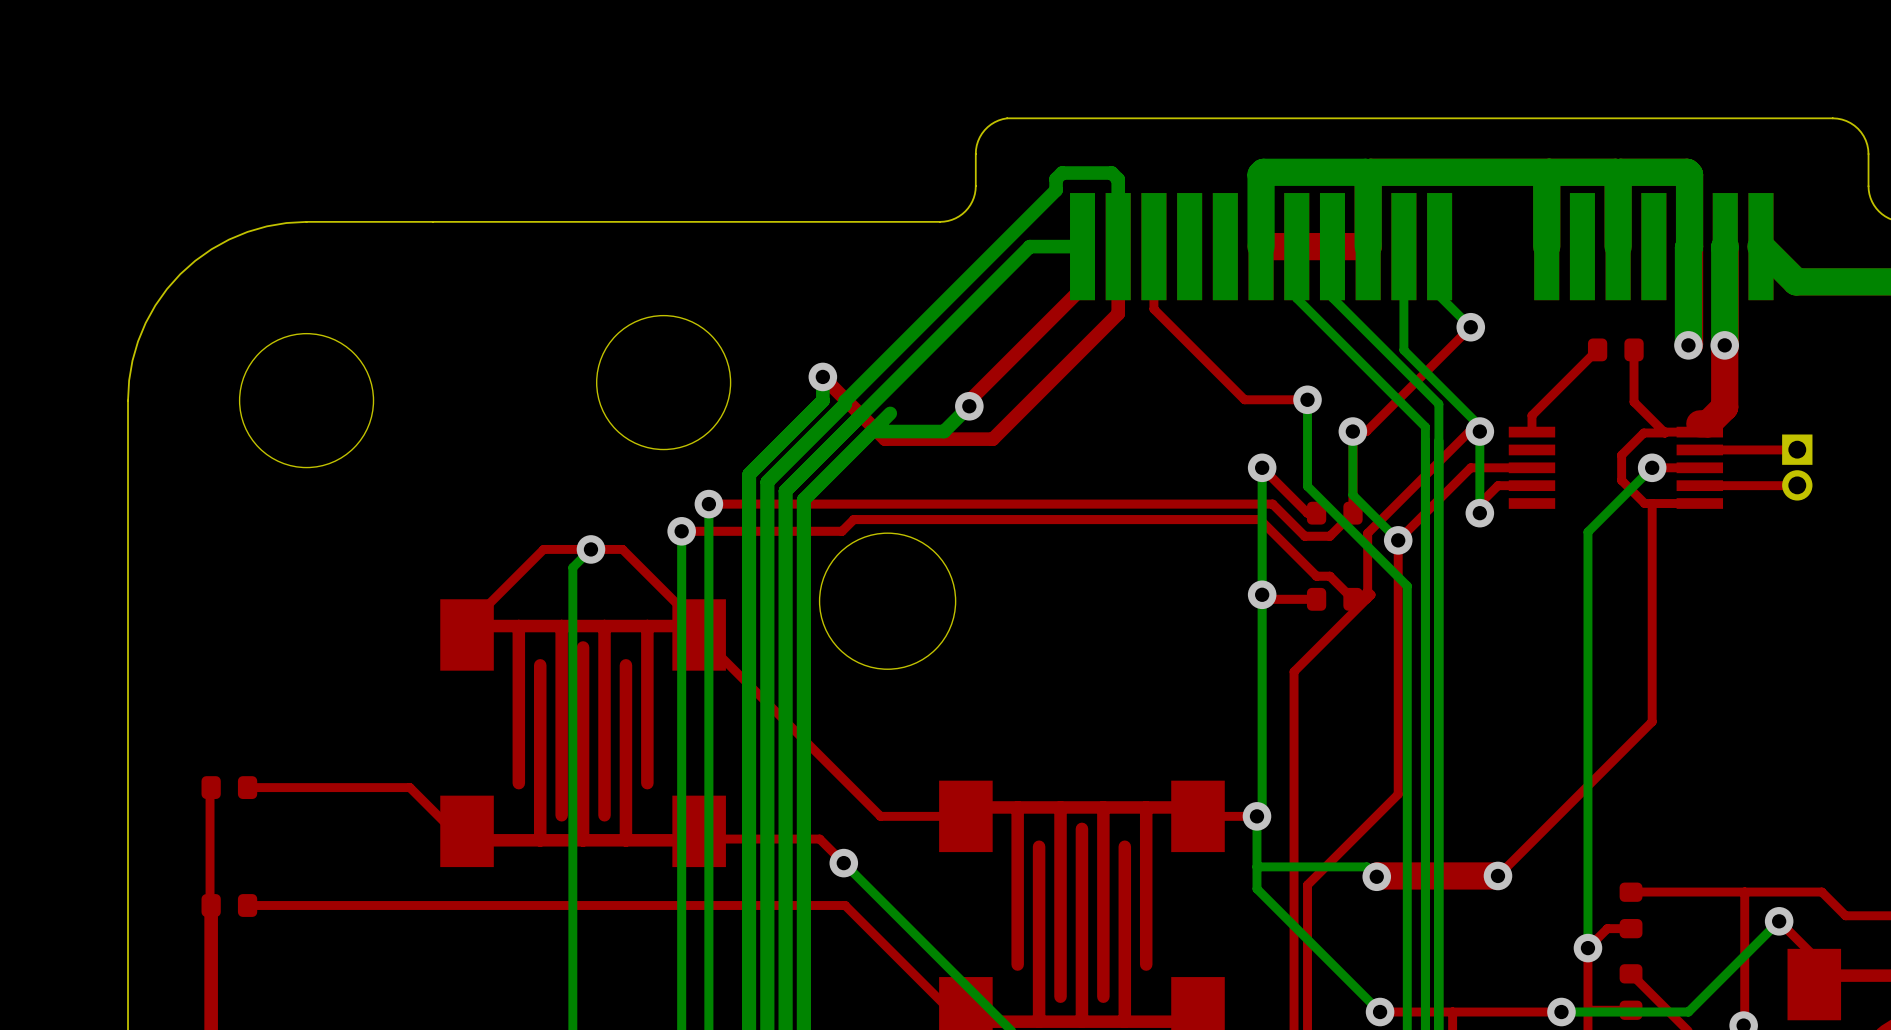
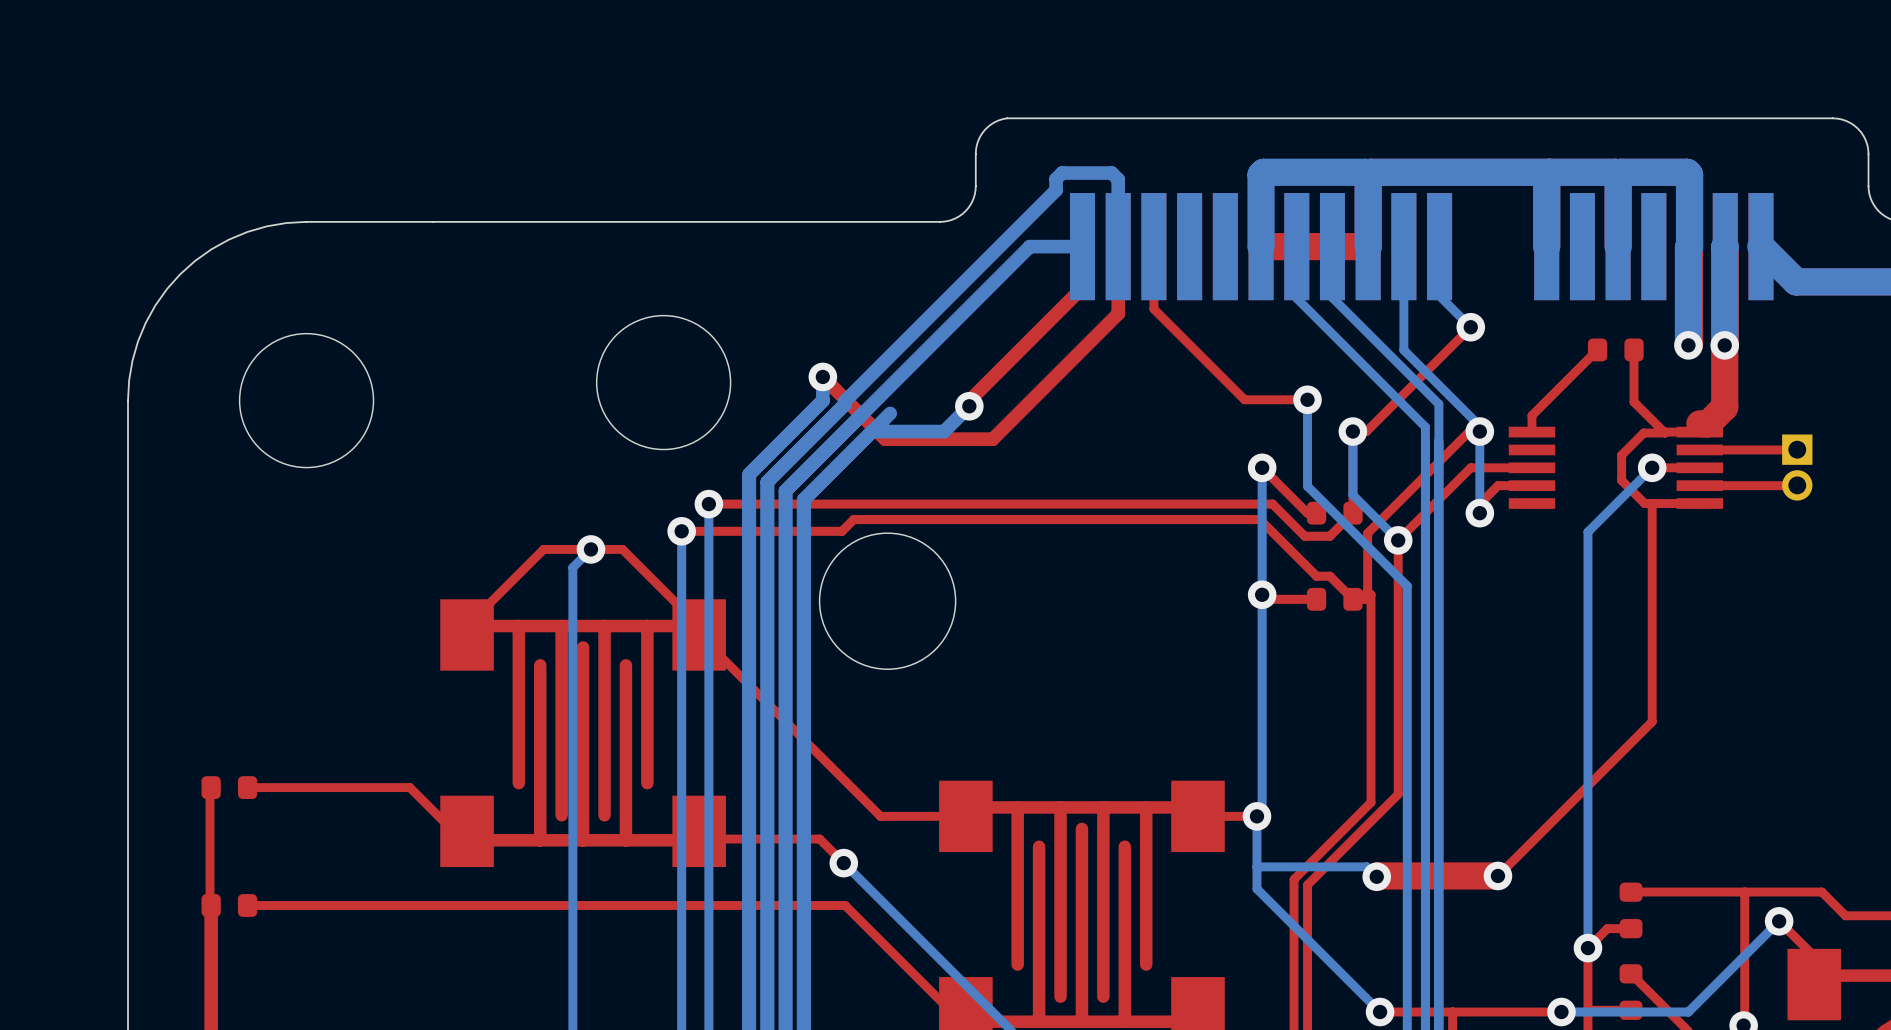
top track: (1371, 594) (1294, 671) (1294, 879) -> (1371, 594) (1371, 802) (1294, 879)

